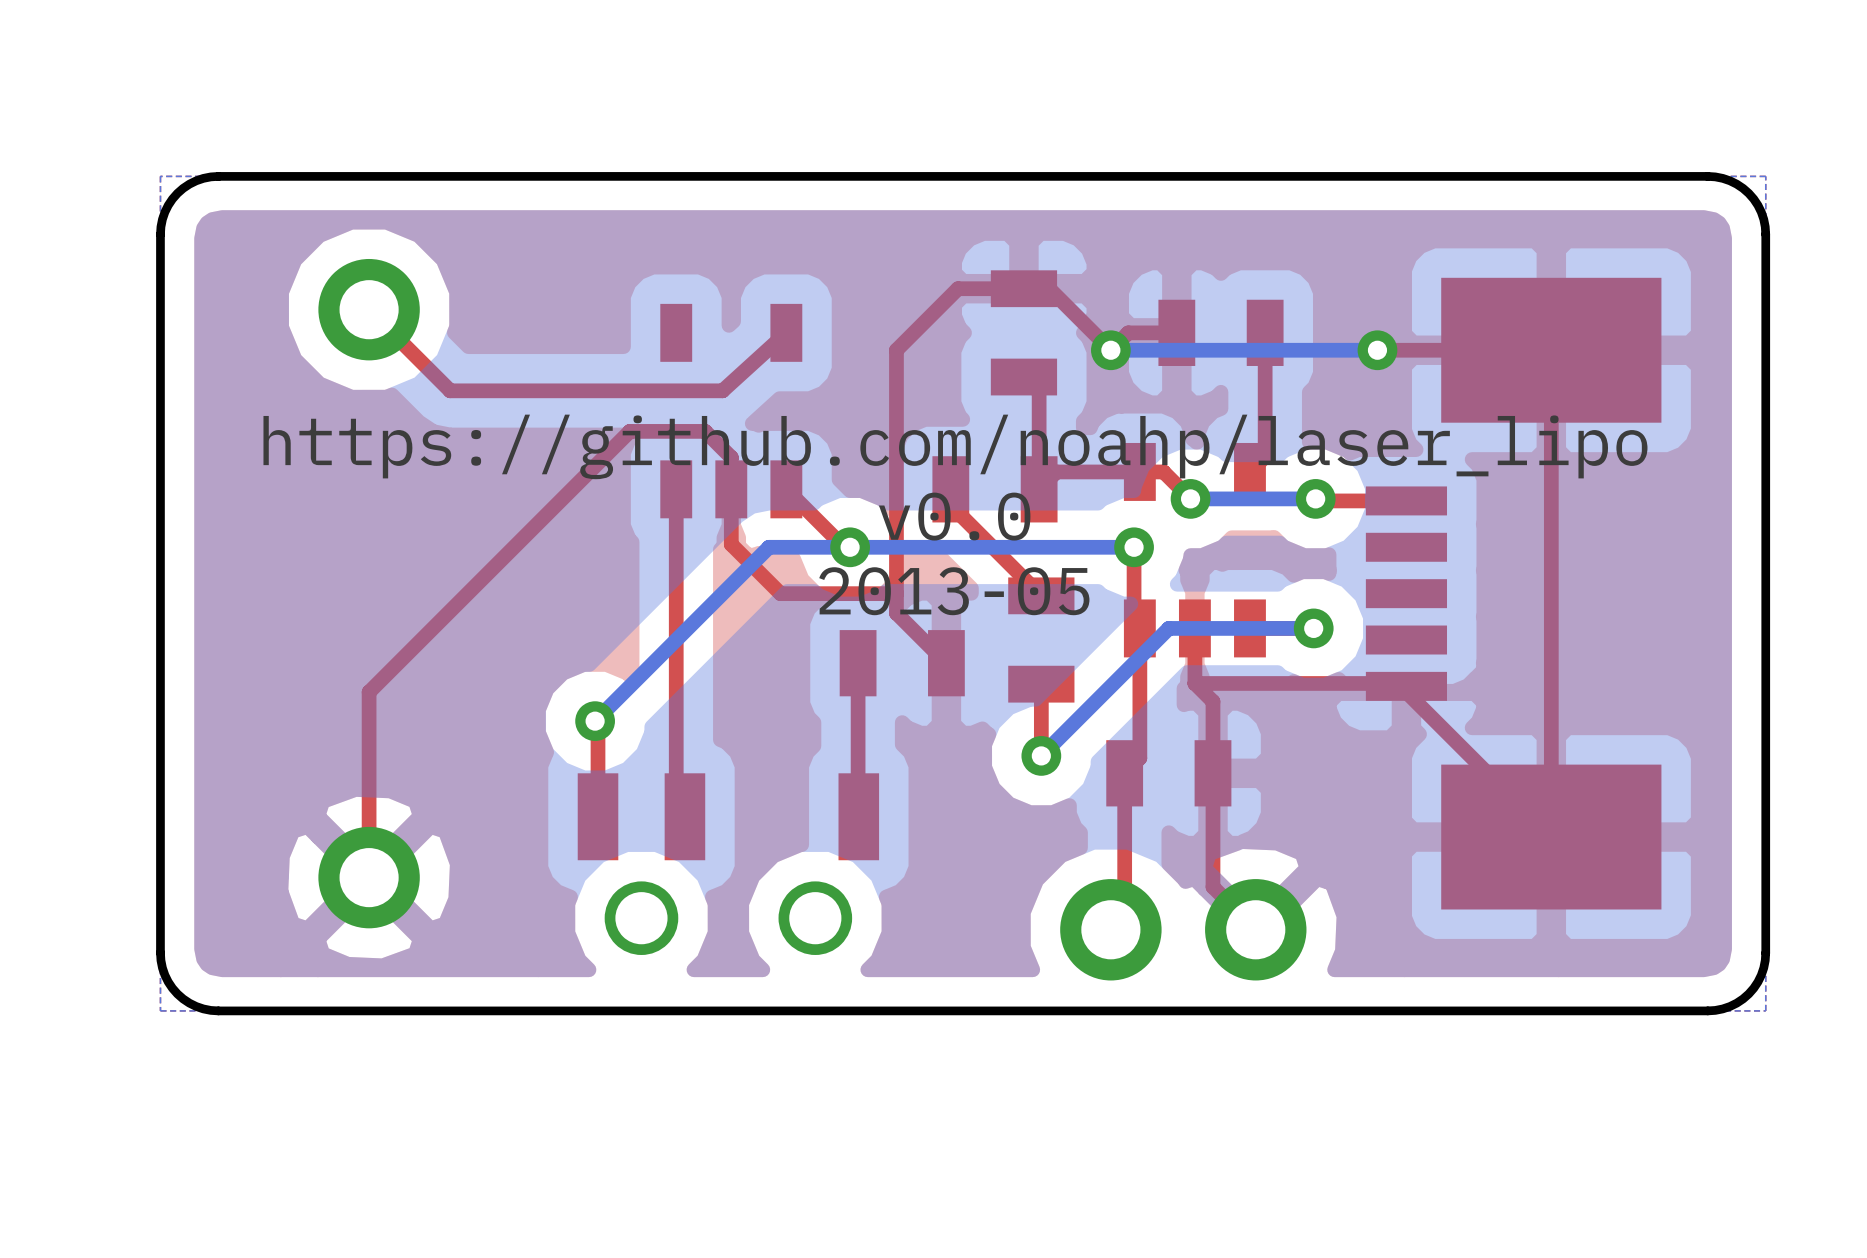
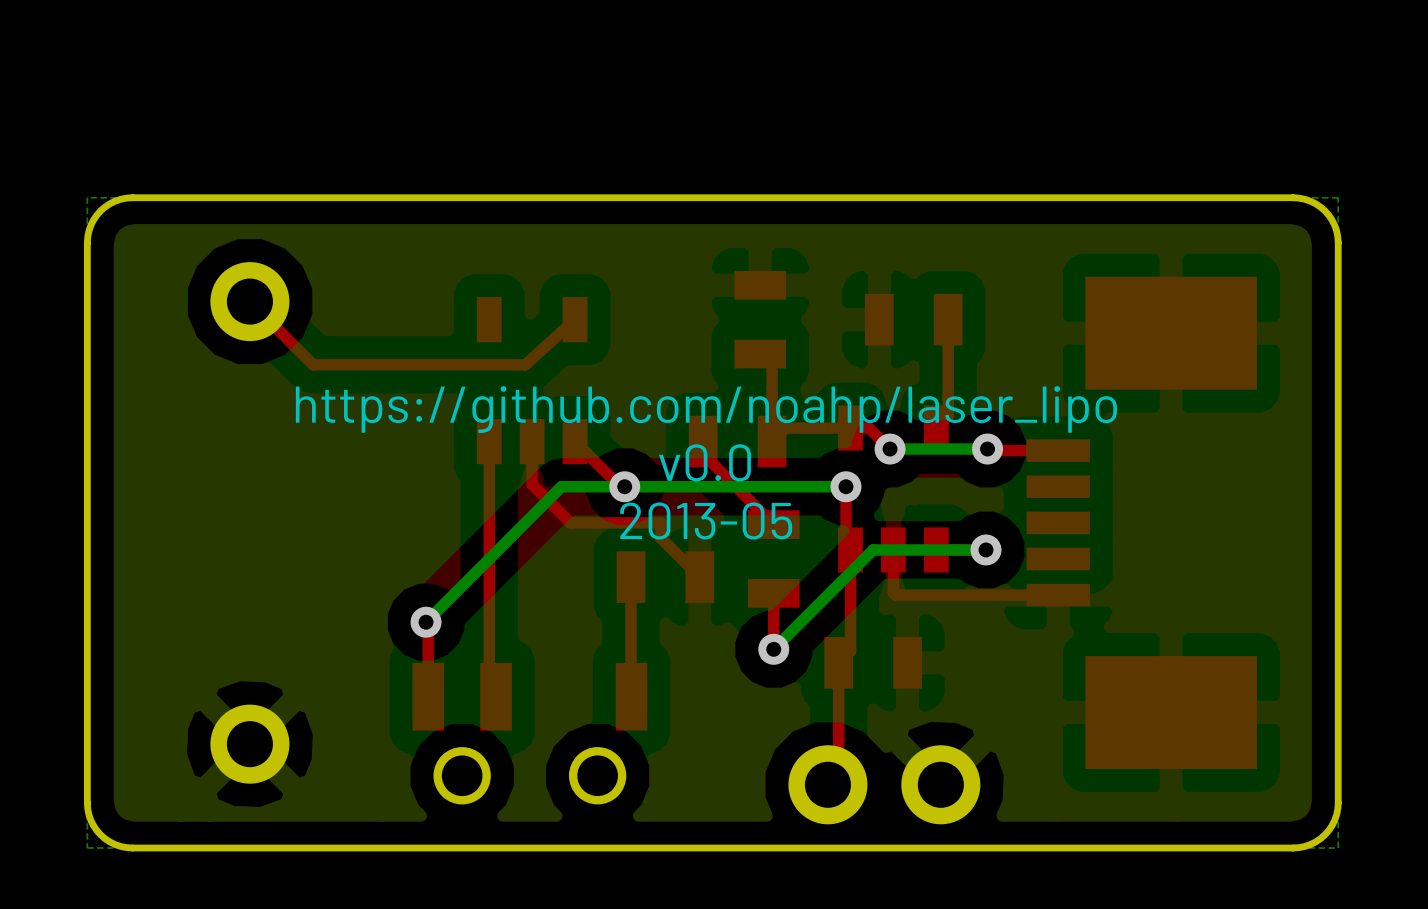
top track: (1176, 332) (1128, 332) (1110, 350) (1049, 288) (958, 288) (896, 350) (896, 593) -> none
via: (1110, 350) -> none
top track: (1377, 350) (1551, 350) (1551, 837) (1406, 692) (1406, 686) (1403, 683) (1194, 683) -> none
bottom track: (1377, 350) (1110, 350) -> none
via: (1377, 350) -> none
top track: (731, 489) (731, 457) (705, 431) (629, 431) (369, 692) (369, 877) -> none
top track: (1197, 686) (1212, 701) (1212, 887) (1255, 929) -> (895, 595) (1058, 595)

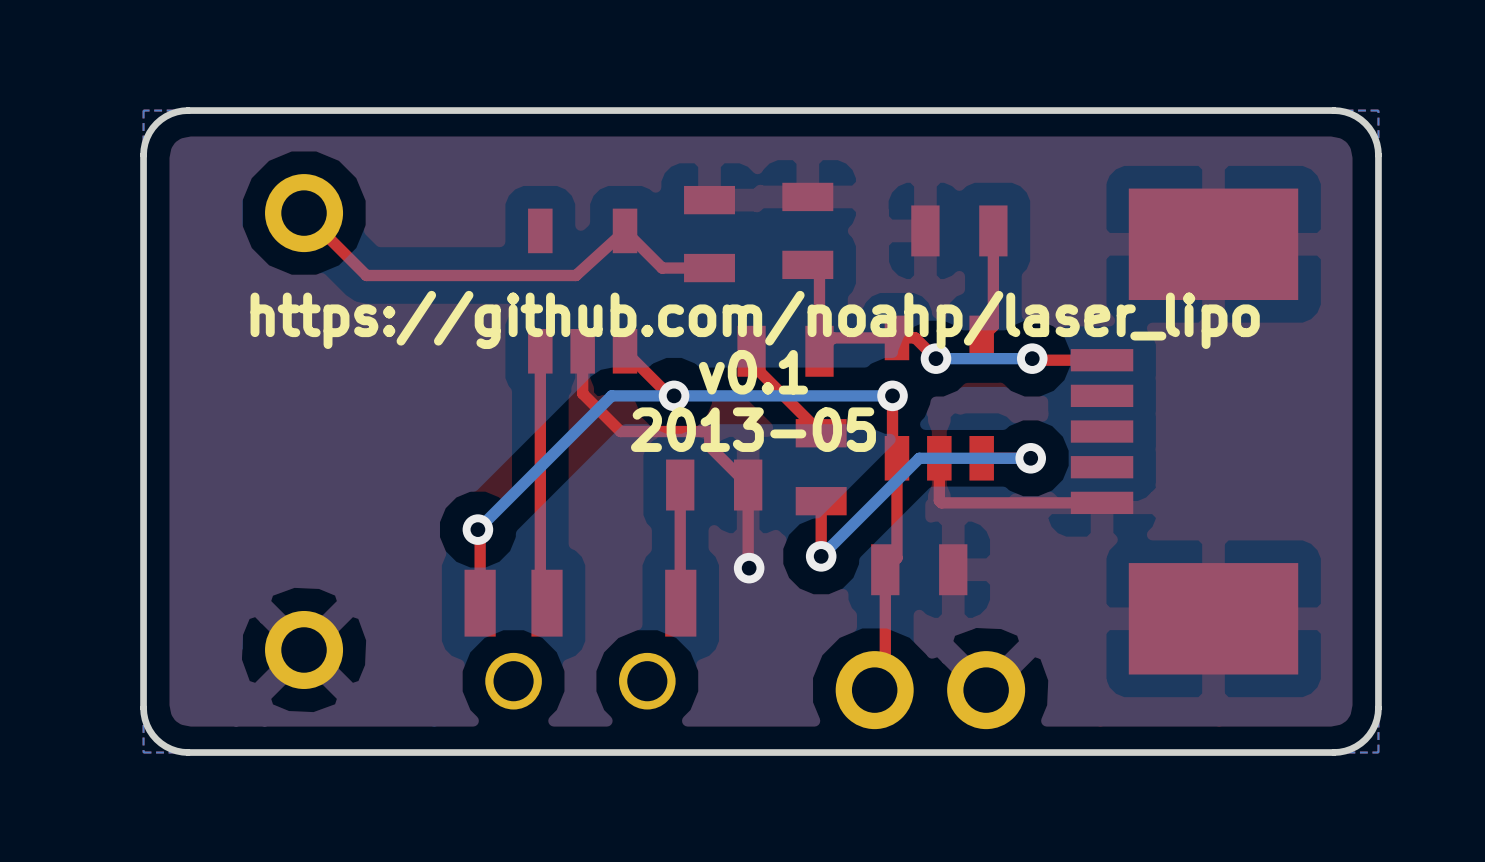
top track: none -> (625, 230) (662, 268) (709, 268)
part: none -> (709, 234)
text: v0.0 (705, 462) -> v0.1 (753, 372)
top track: none -> (748, 485) (749, 568)
via: none -> (749, 568)

